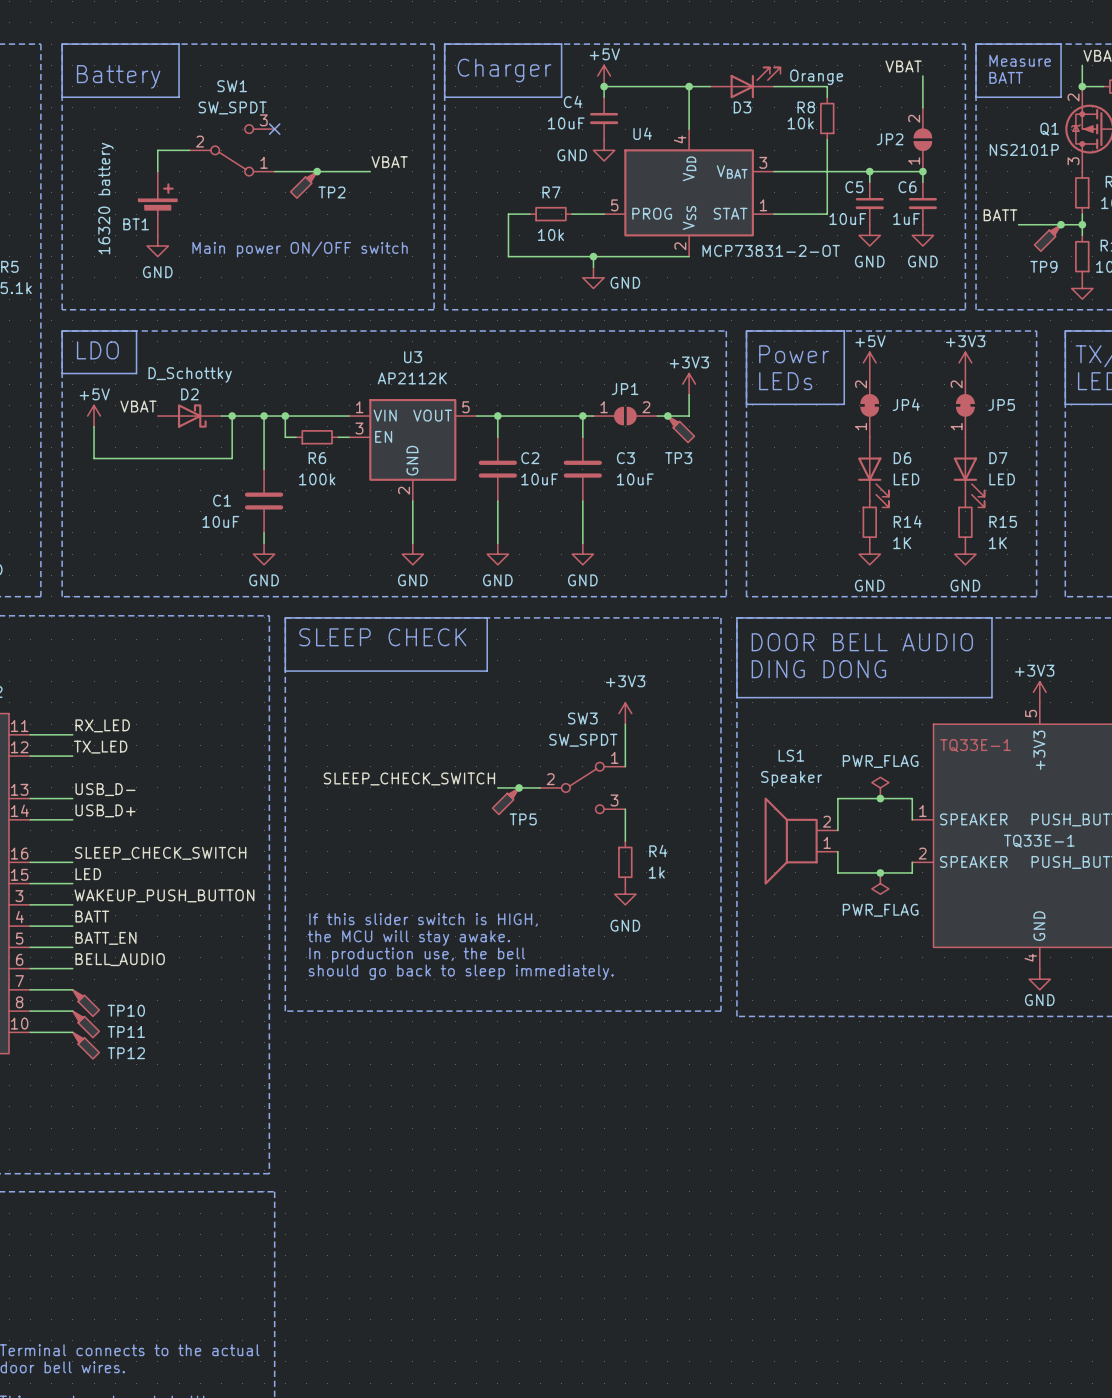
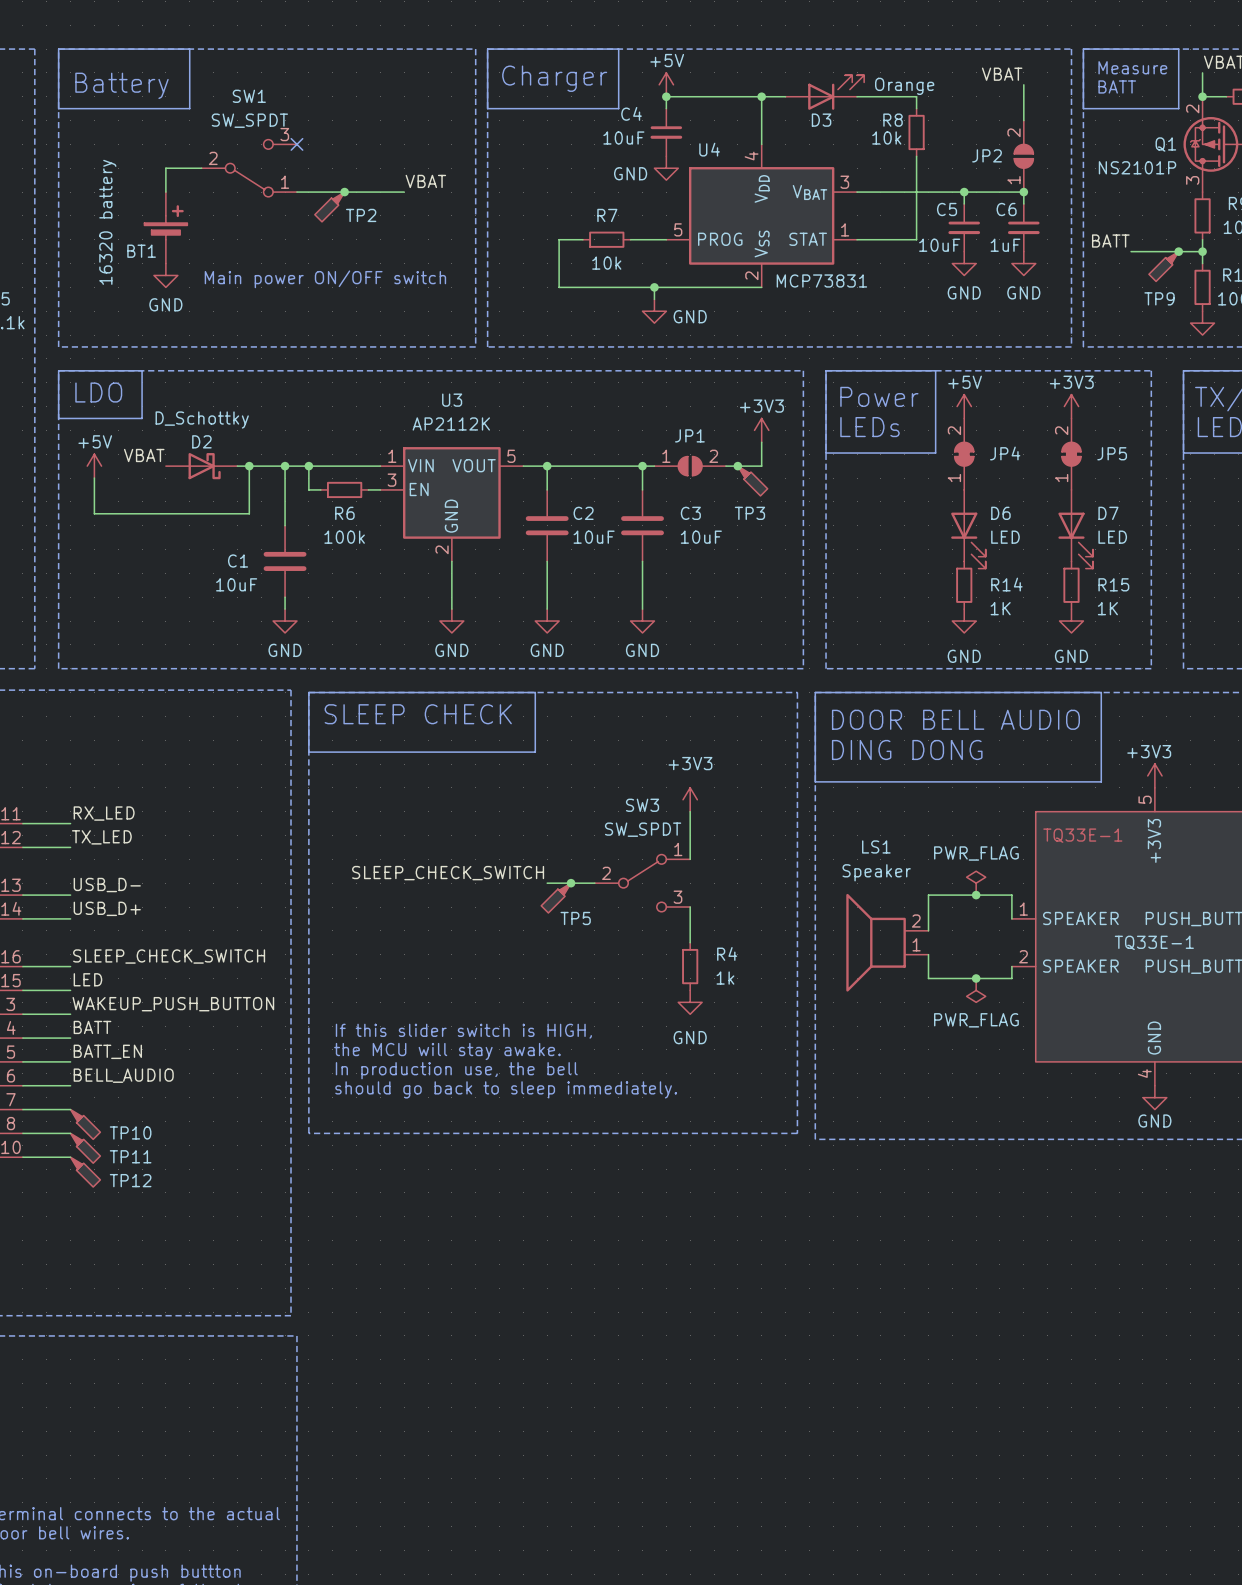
U4 value: MCP73831-2-OT (771, 250) -> MCP73831 (821, 280)

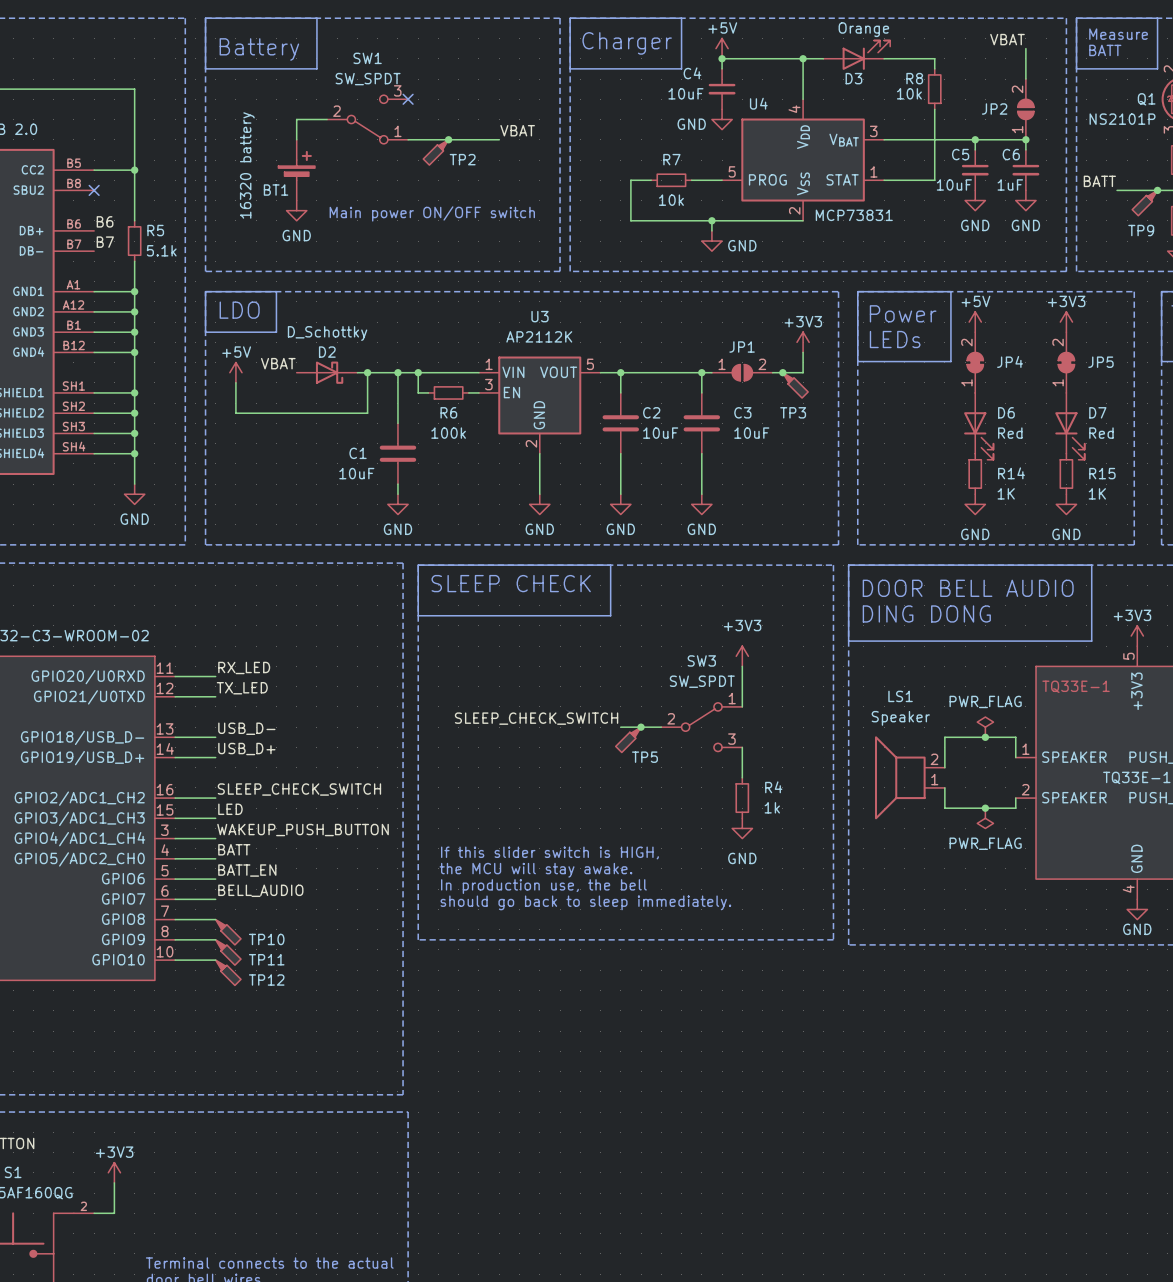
D3 value position: Orange (904, 86) -> Orange (863, 29)
D6 value: LED (1005, 537) -> Red (1010, 433)
D7 value: LED (1112, 537) -> Red (1101, 433)

